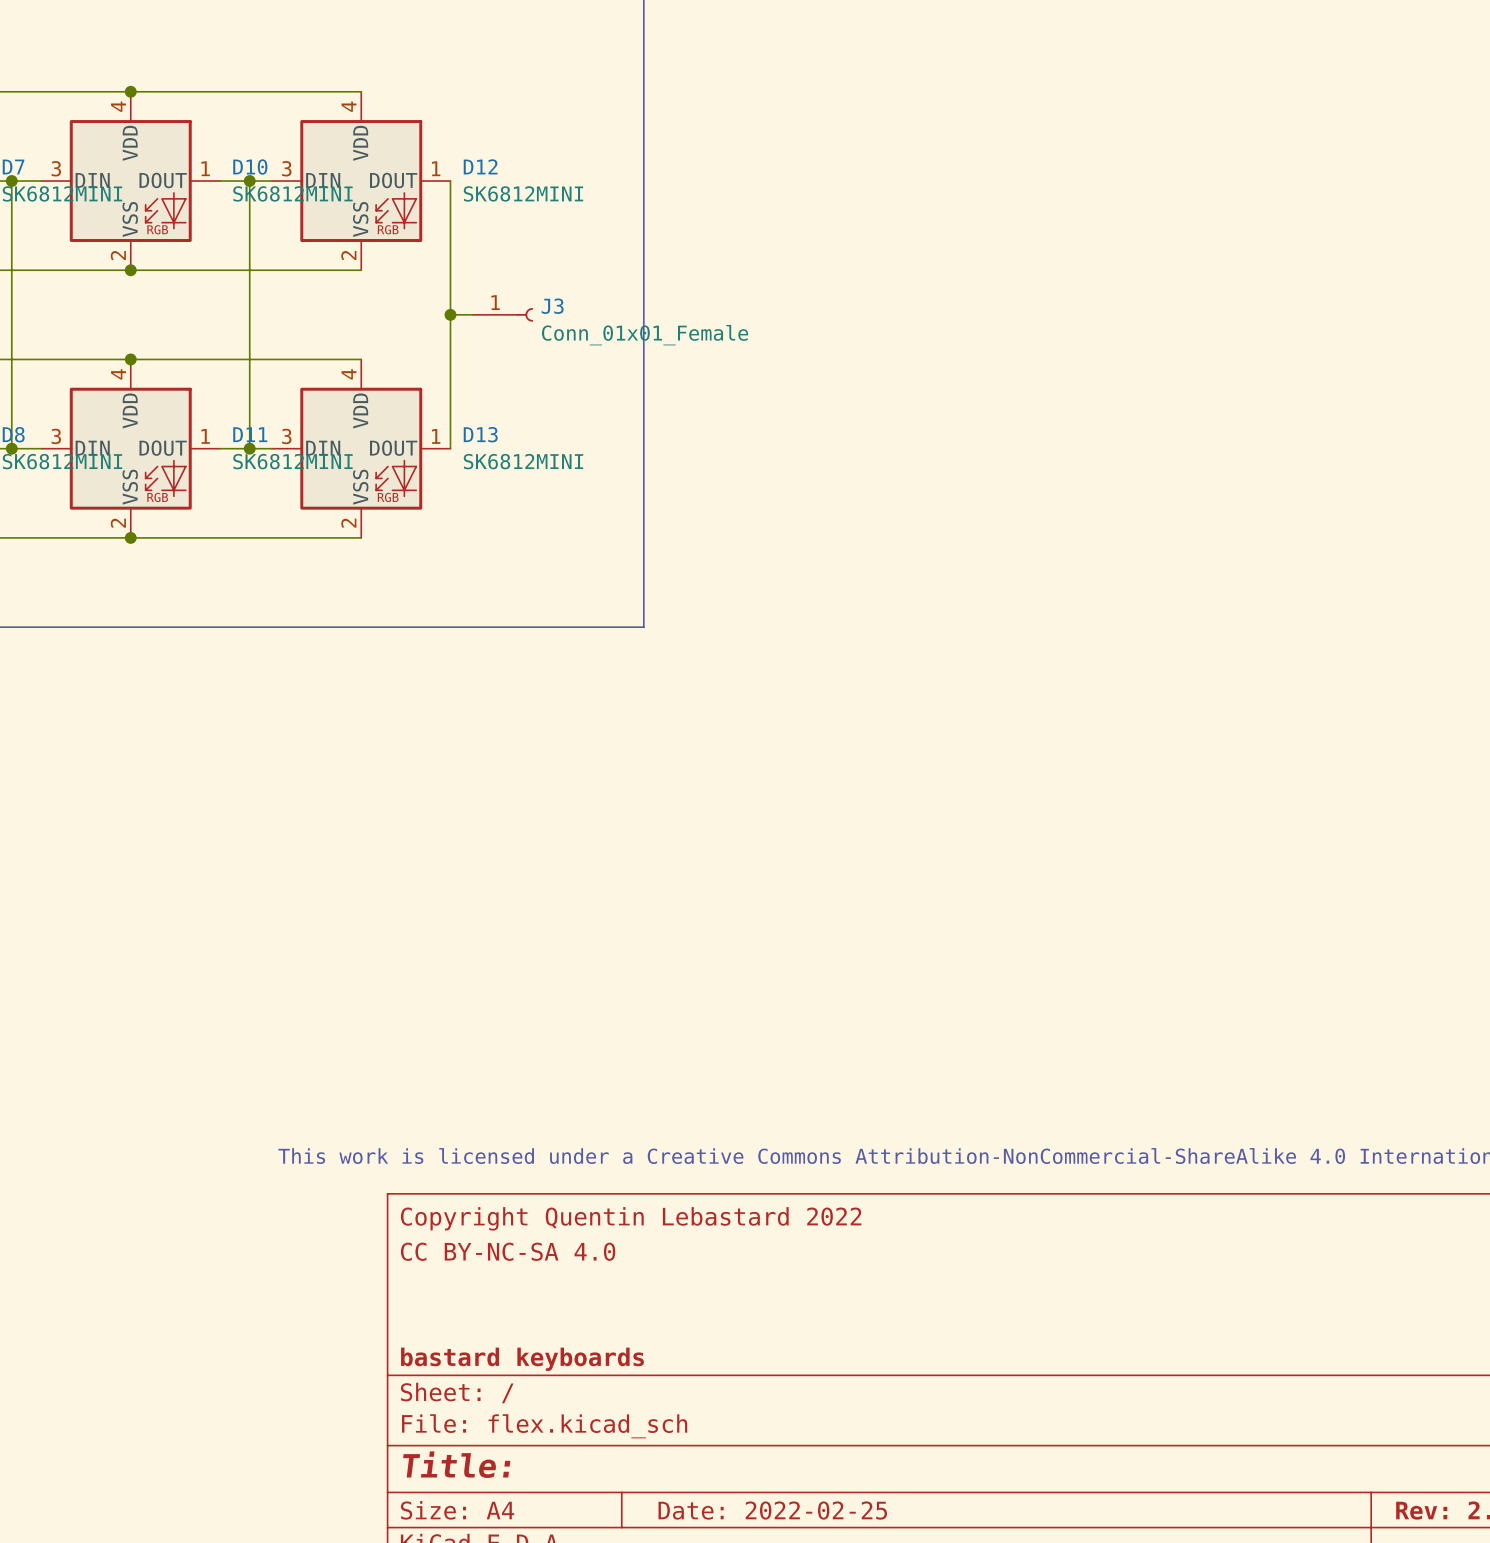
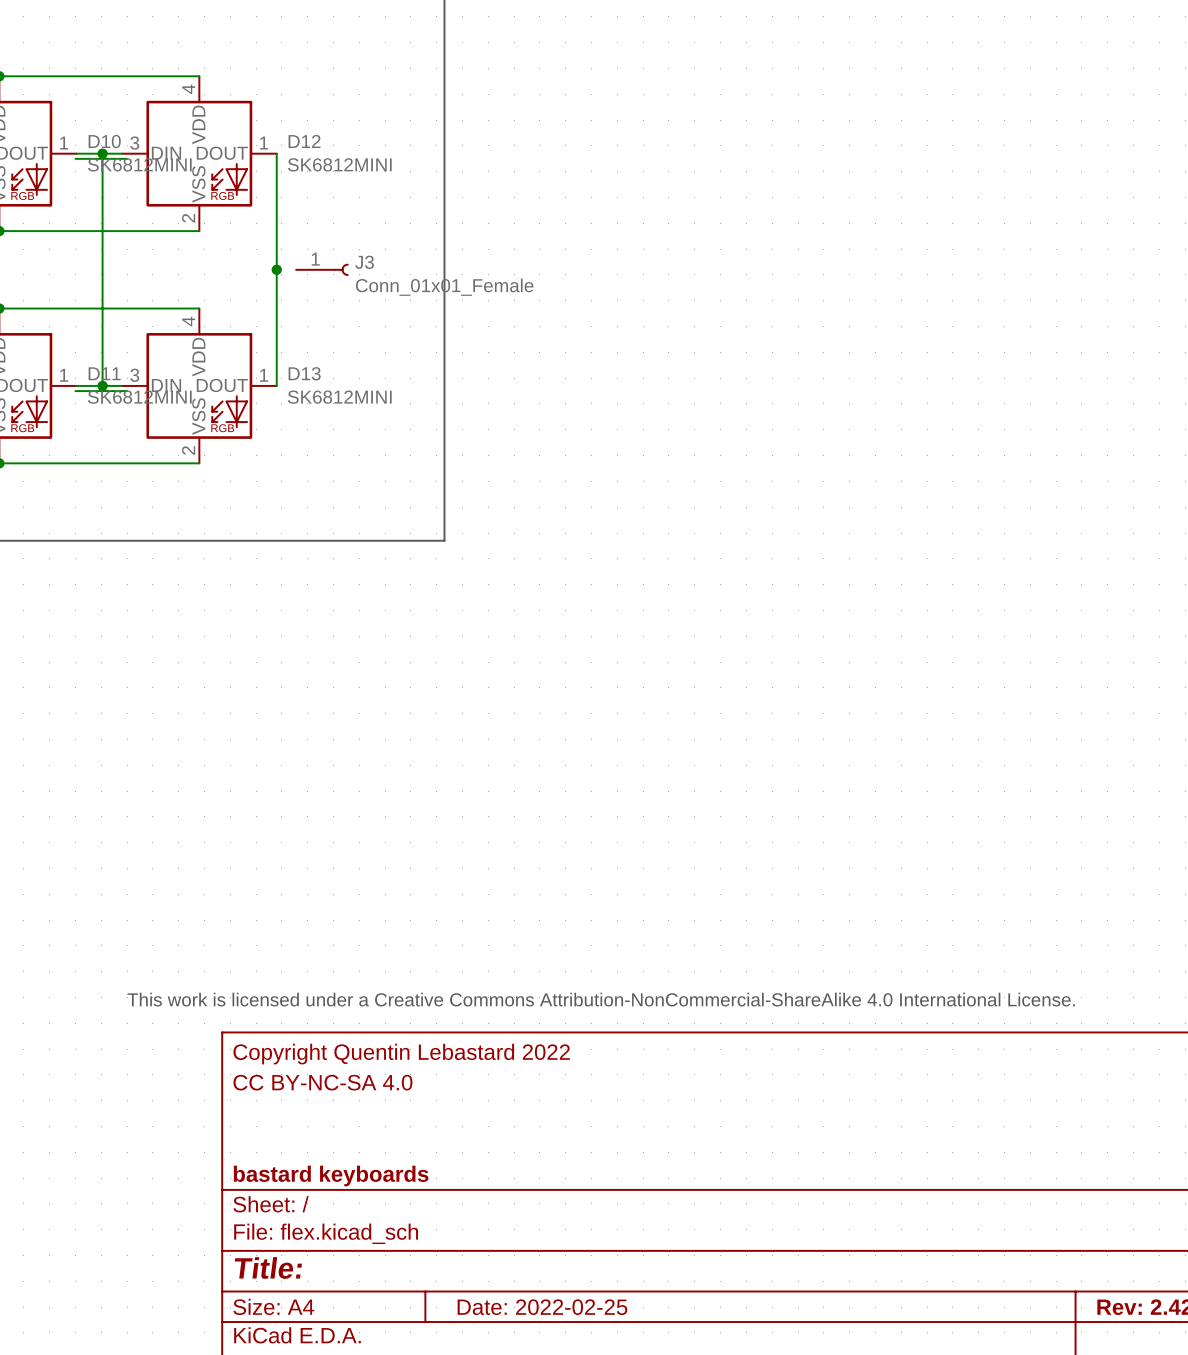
wire: none -> (75, 158) (127, 158)
wire: (450, 314) (472, 314) -> none
wire: none -> (75, 391) (127, 391)

